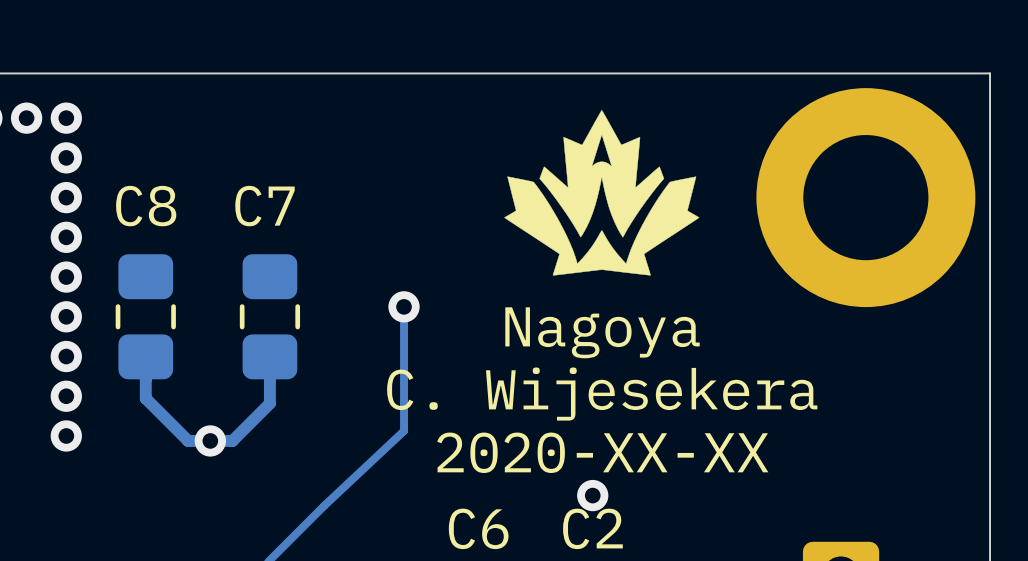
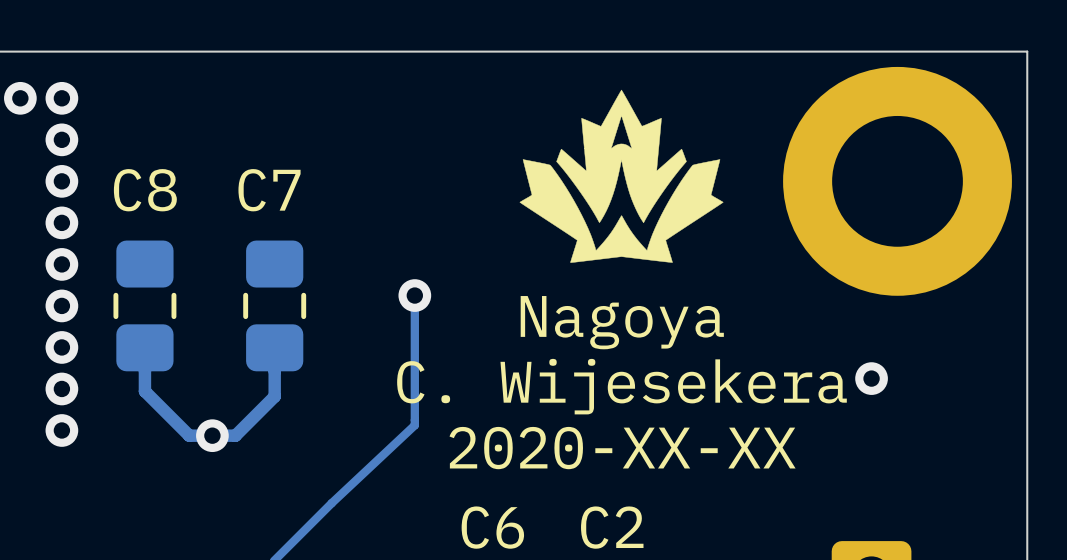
via: none -> (871, 378)
via: (592, 495) -> none

